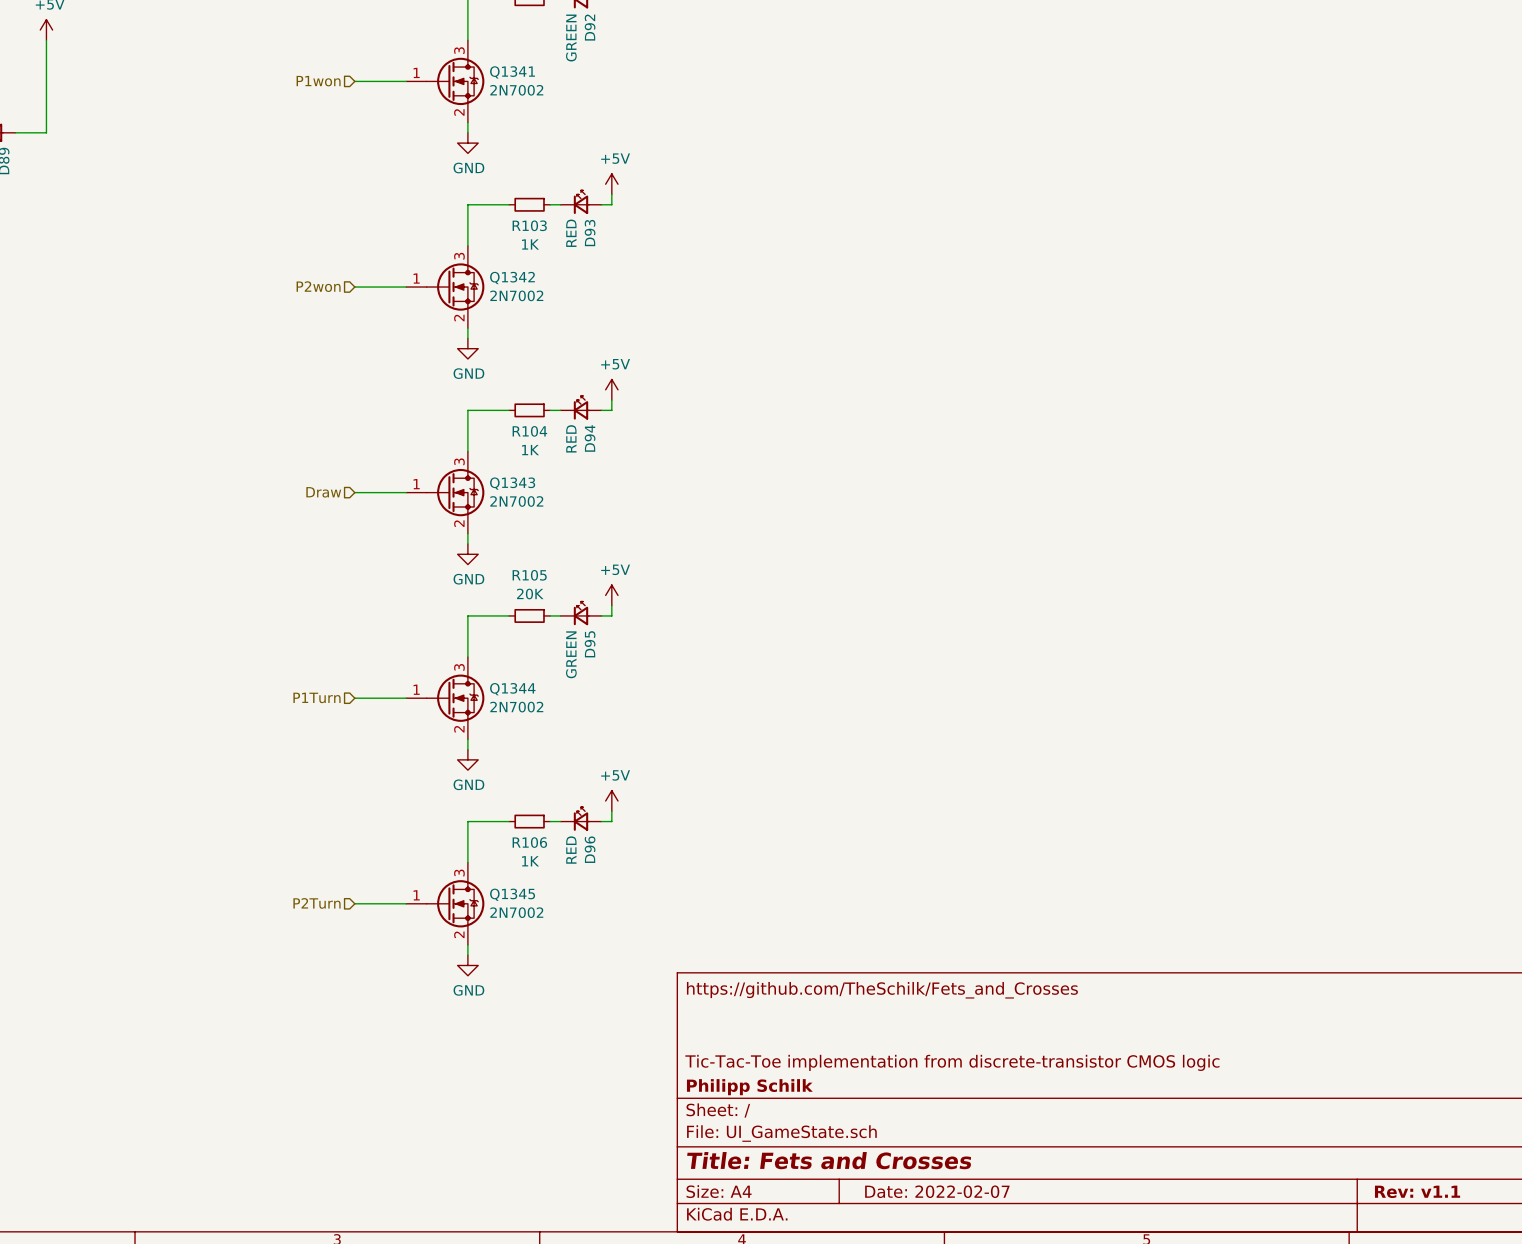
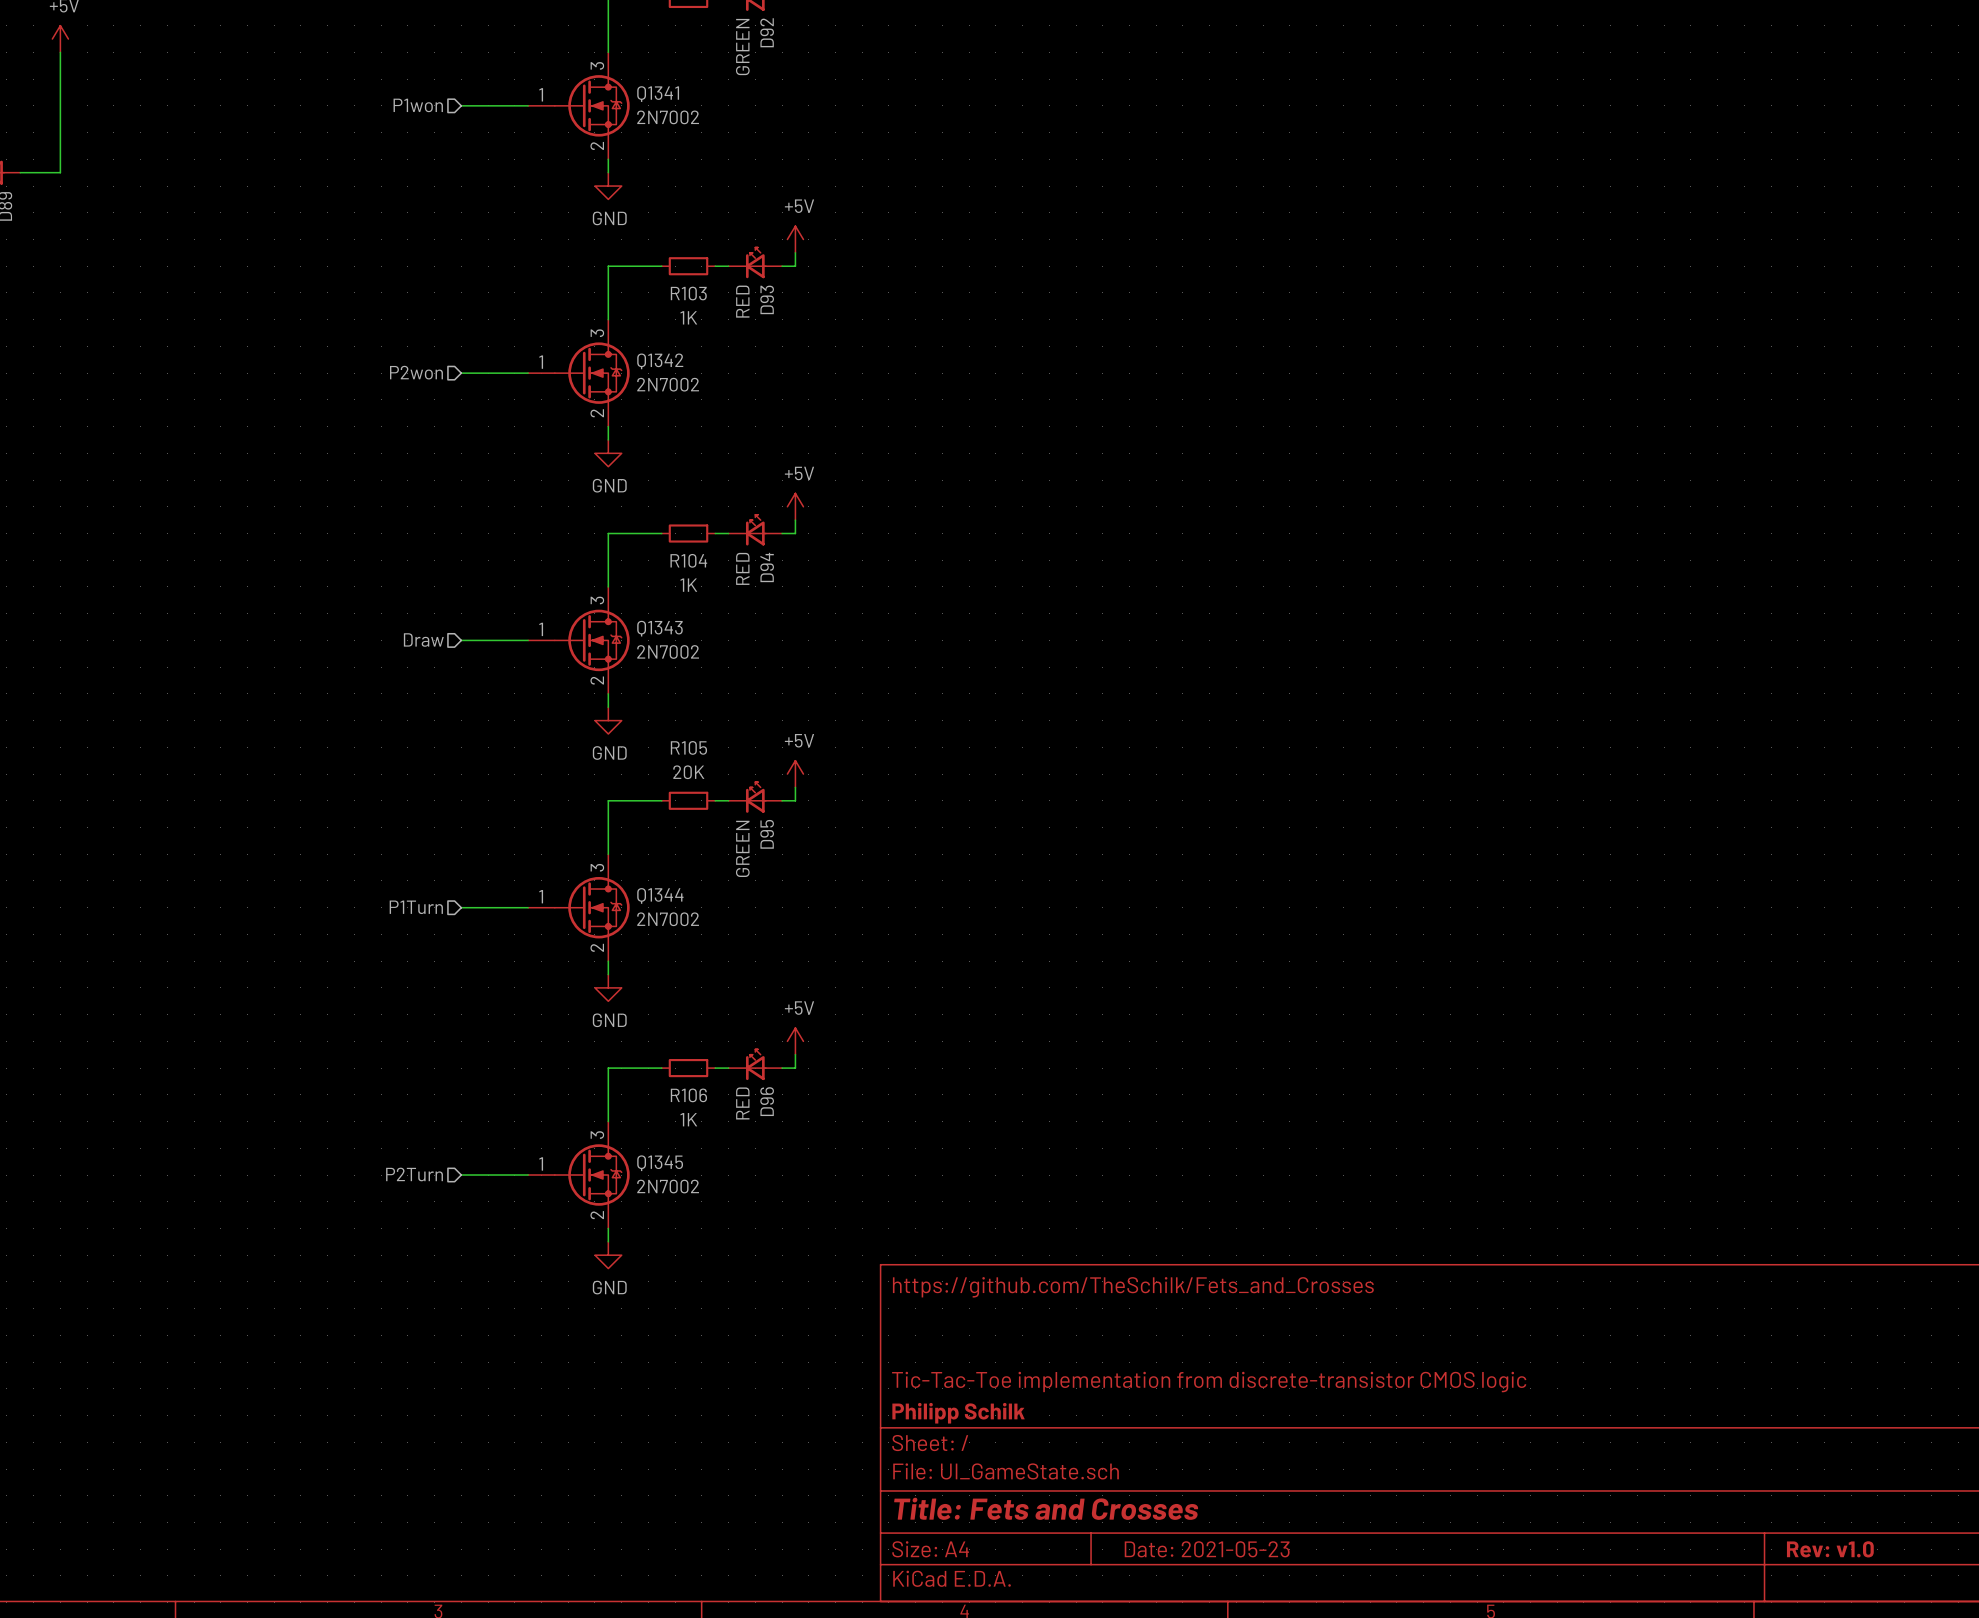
title block: Date: 2022-02-07 (937, 1191) -> Date: 2021-05-23 (1207, 1549)
title block: Rev: v1.1 (1417, 1191) -> Rev: v1.0 (1830, 1549)

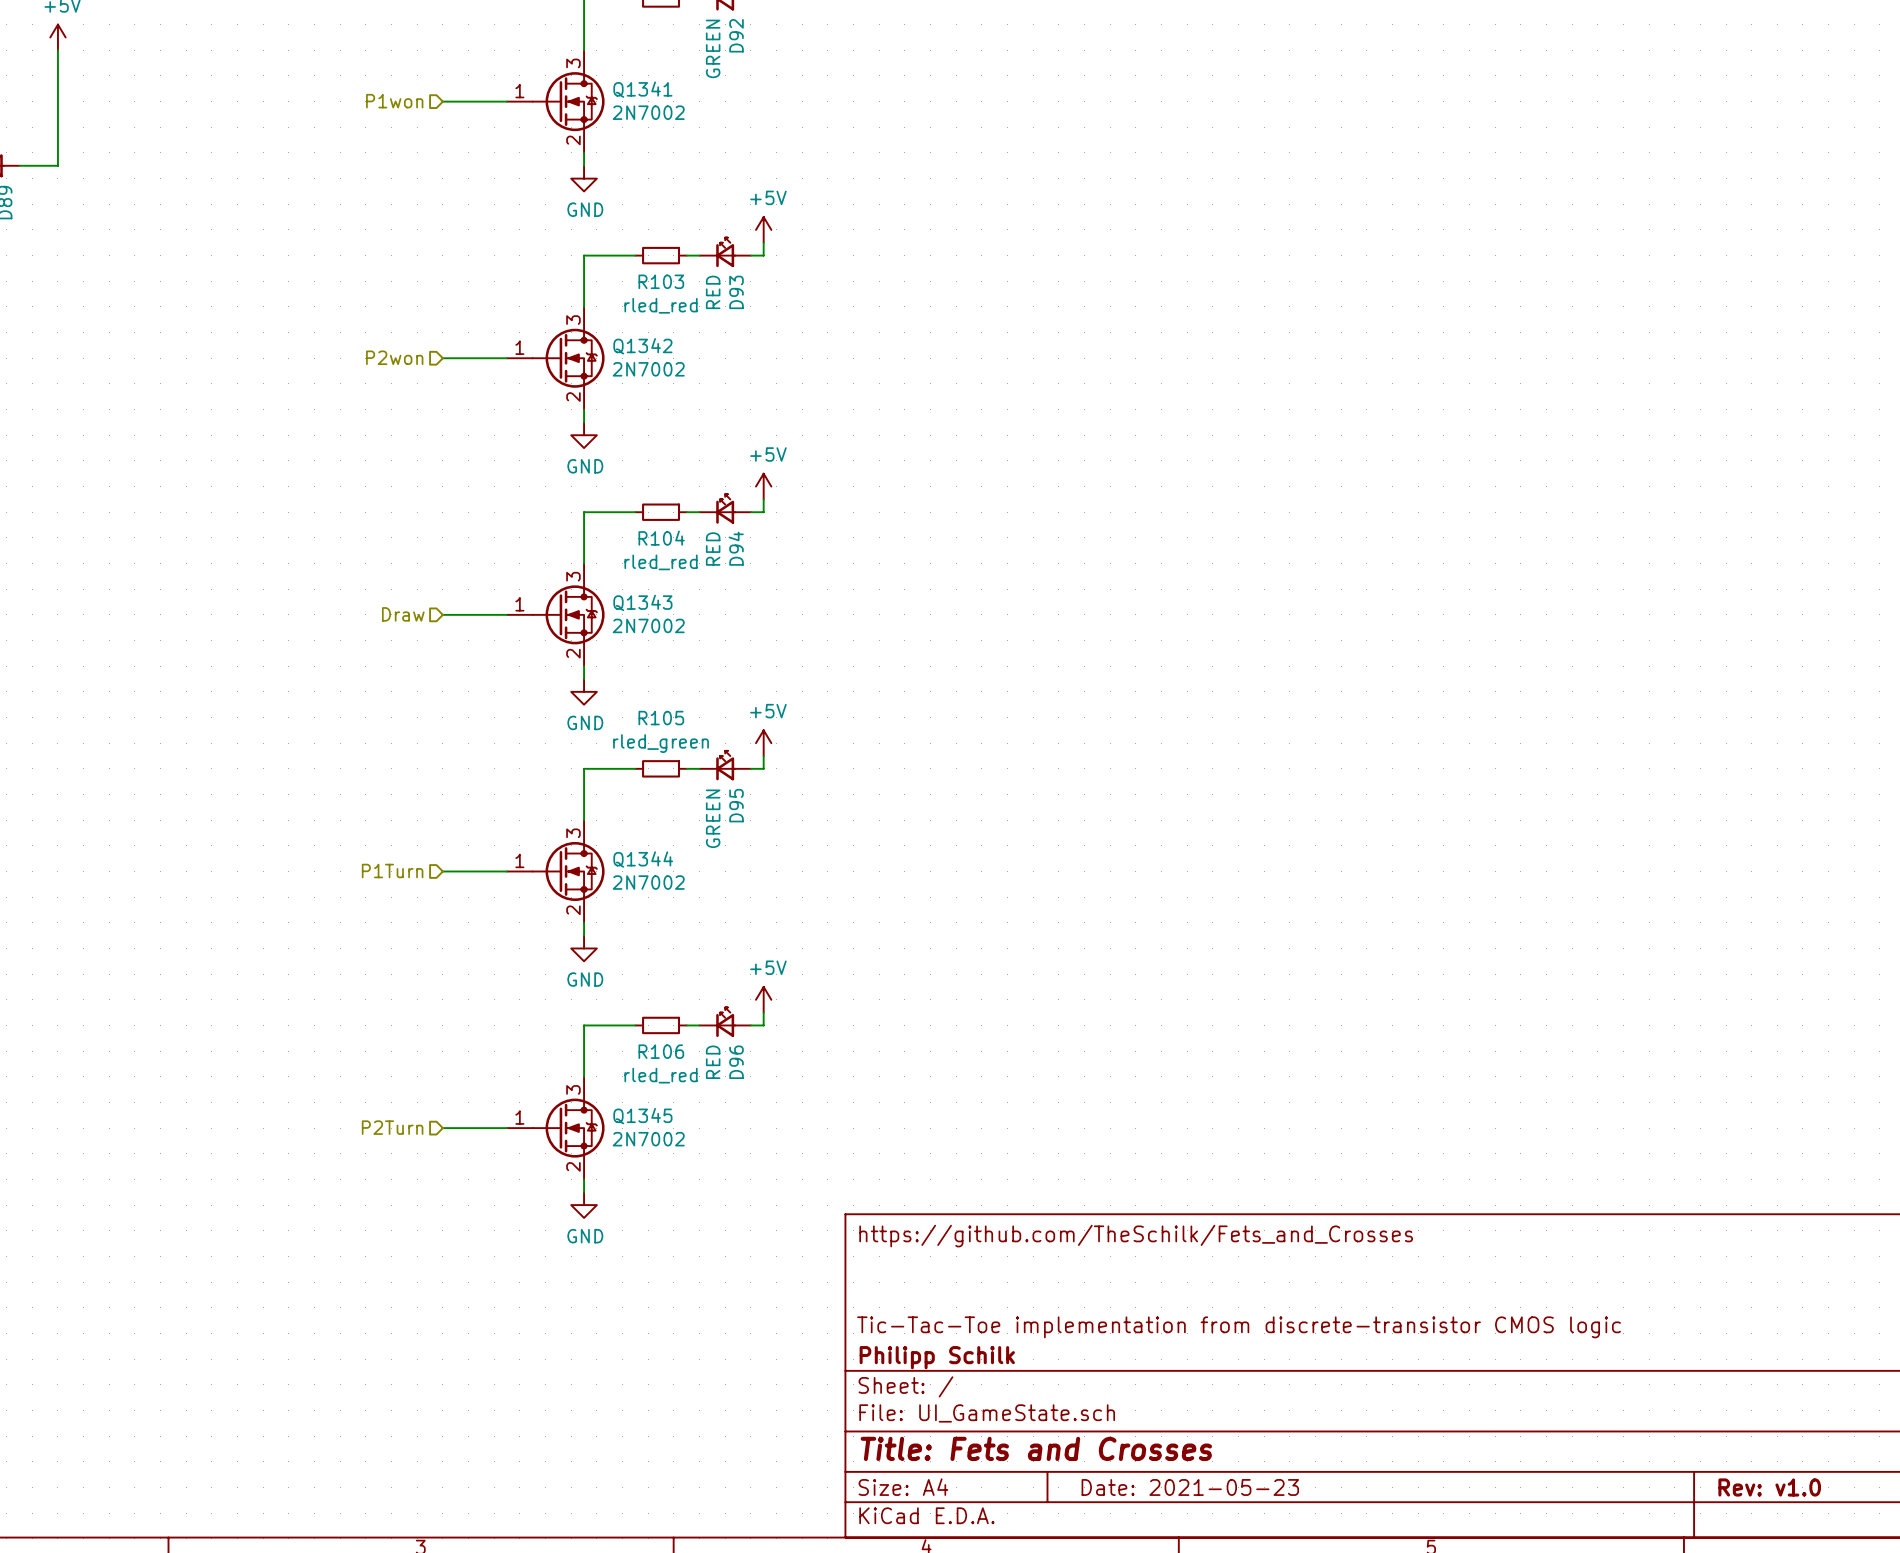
R103 value: 1K (688, 317) -> rled_red (661, 305)
R104 value: 1K (688, 585) -> rled_red (661, 562)
R105 value: 20K (688, 772) -> rled_green (661, 743)
R106 value: 1K (688, 1119) -> rled_red (661, 1075)

